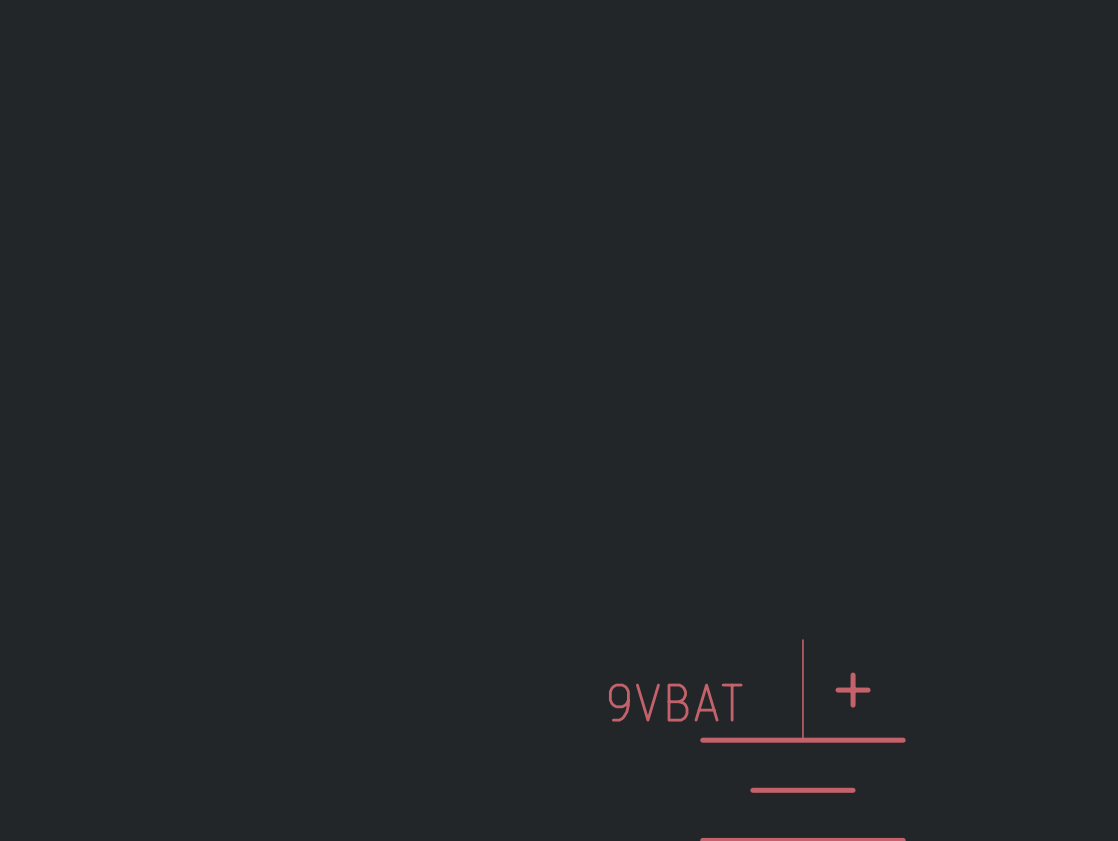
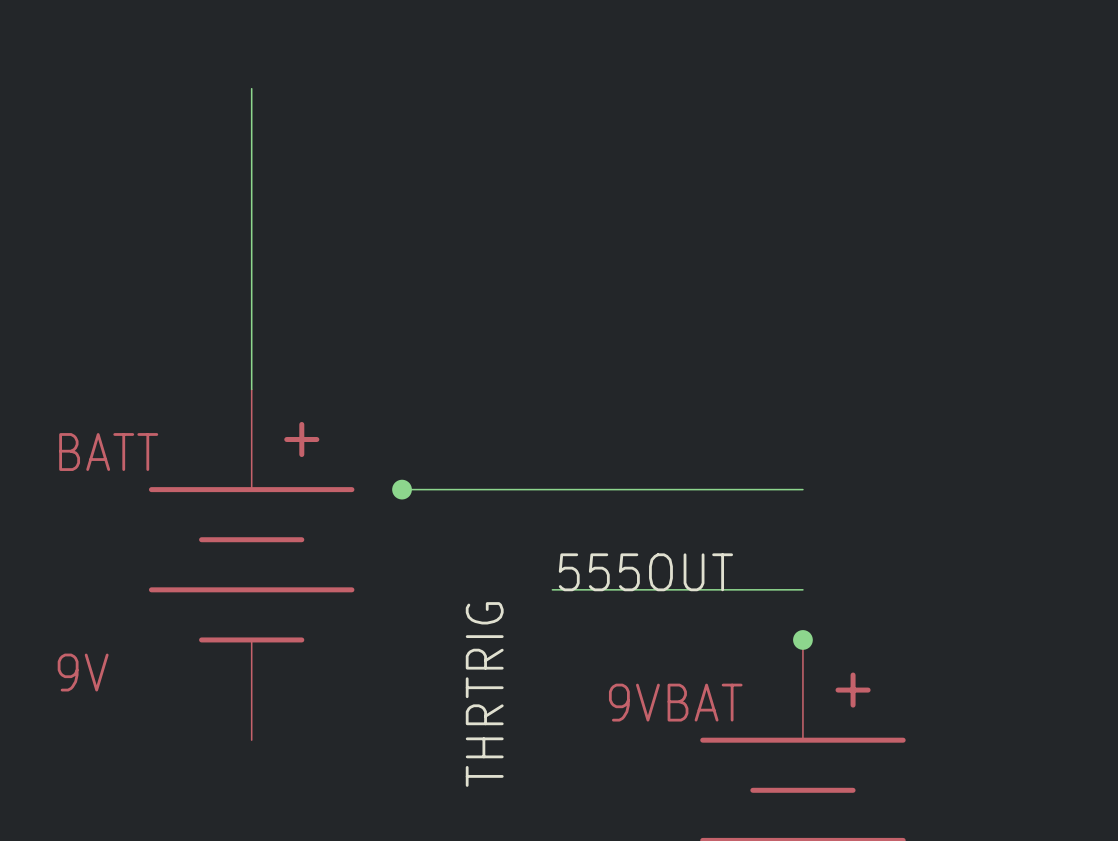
wire: none -> (251, 88) (251, 389)
wire: none -> (402, 489) (802, 489)
junction: none -> (402, 489)
BATT: none -> 9V (251, 564)
label: none -> 555OUT (645, 572)
wire: none -> (552, 589) (802, 589)
junction: none -> (802, 639)
label: none -> THRTRIG (484, 694)

